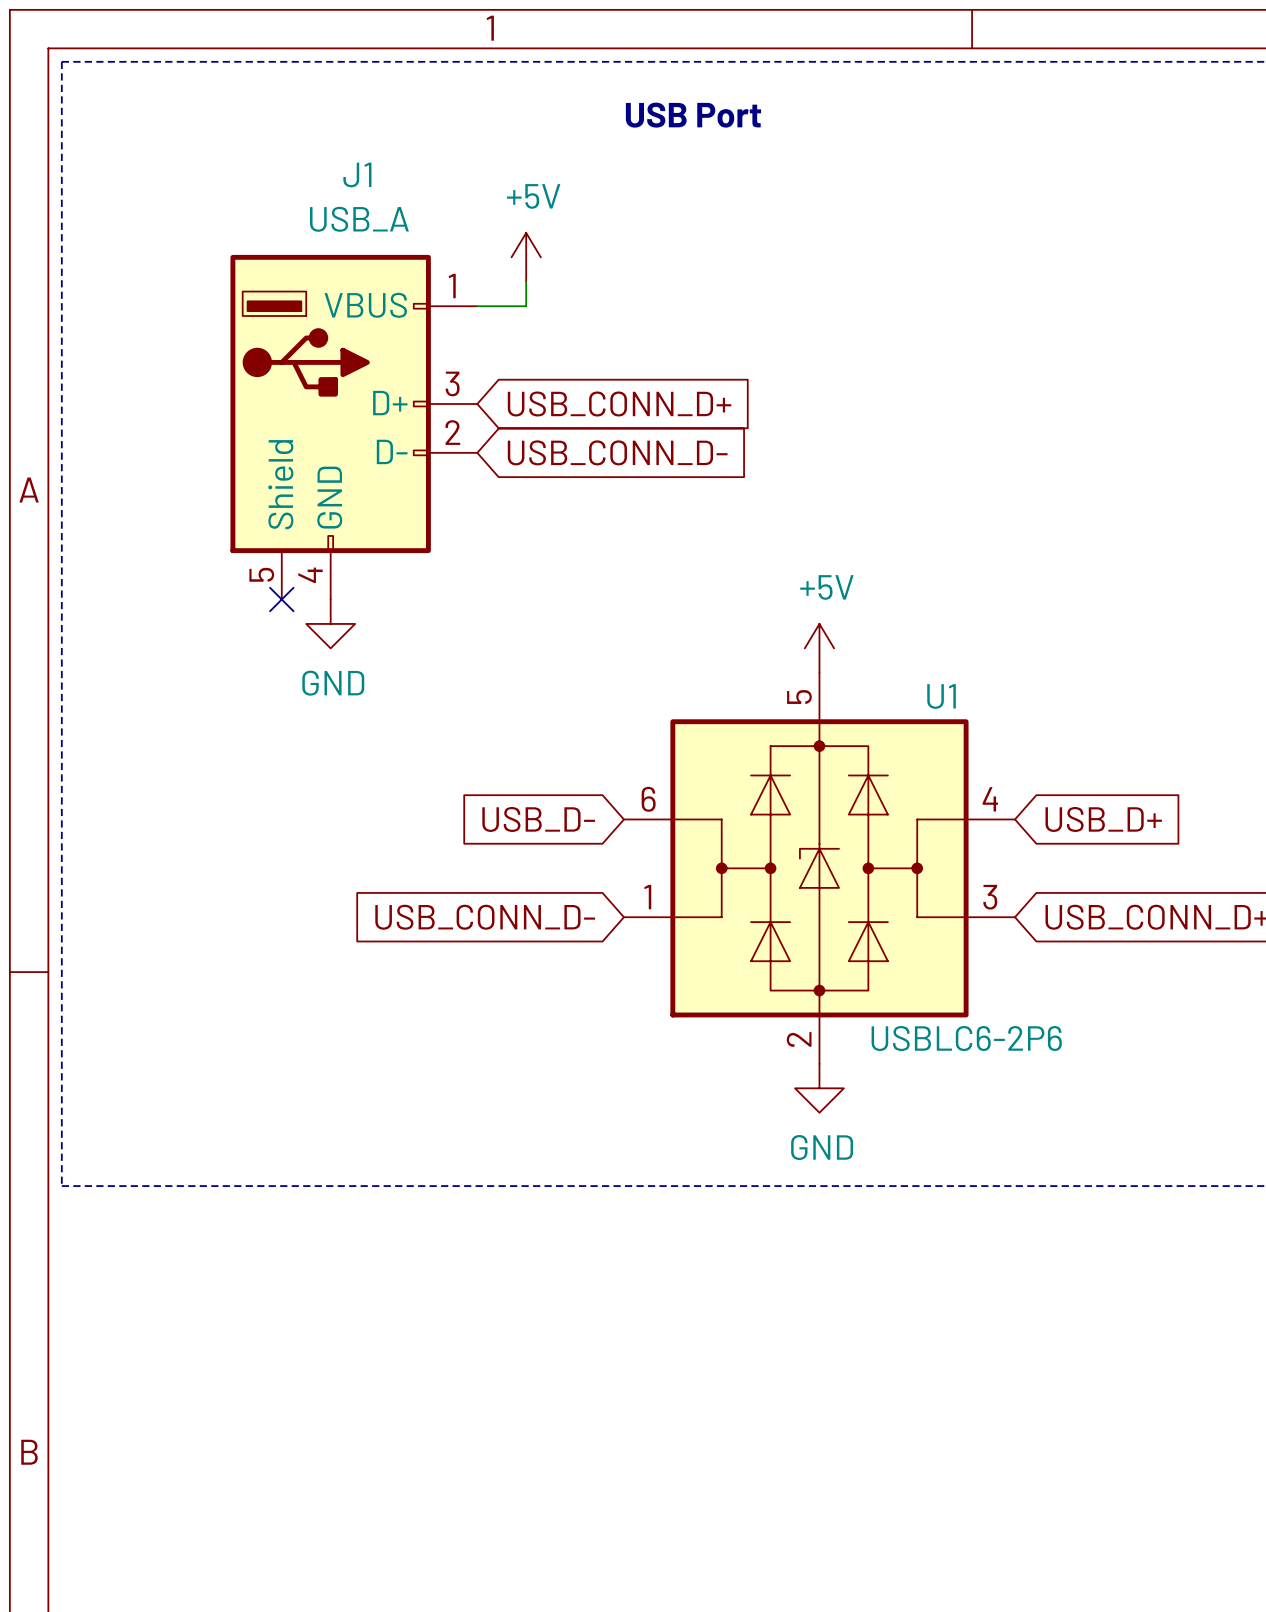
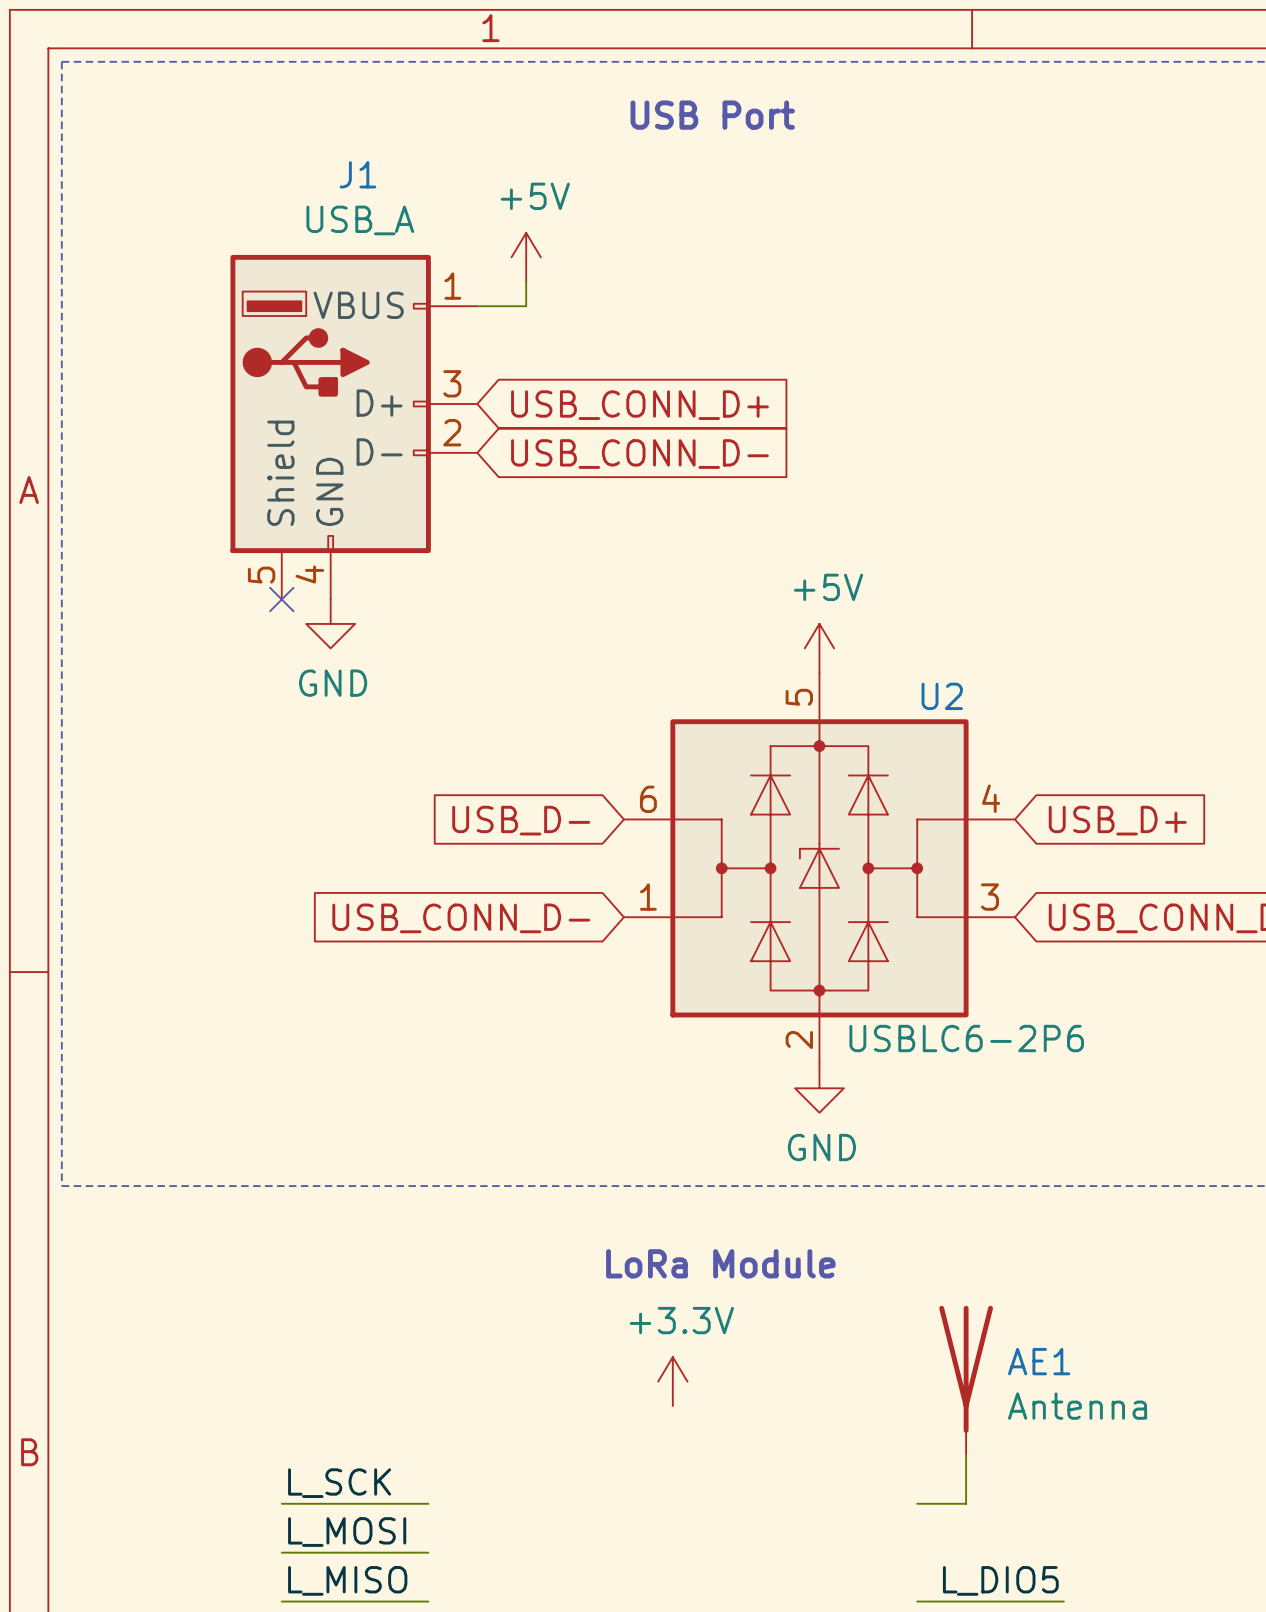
U1 name: U1 (941, 696) -> U2 (942, 696)
text: none -> LoRa Module (720, 1263)
AE1: none -> Antenna (966, 1380)
power symbol: none -> +3.3V (672, 1381)
wire: none -> (966, 1454) (966, 1503) (917, 1503)
label: none -> L_SCK (339, 1483)
wire: none -> (281, 1503) (428, 1503)
label: none -> L_MOSI (347, 1532)
wire: none -> (281, 1552) (428, 1552)
label: none -> L_MISO (347, 1580)
label: none -> L_DIO5 (1000, 1580)
wire: none -> (281, 1601) (428, 1601)
wire: none -> (917, 1601) (1063, 1601)

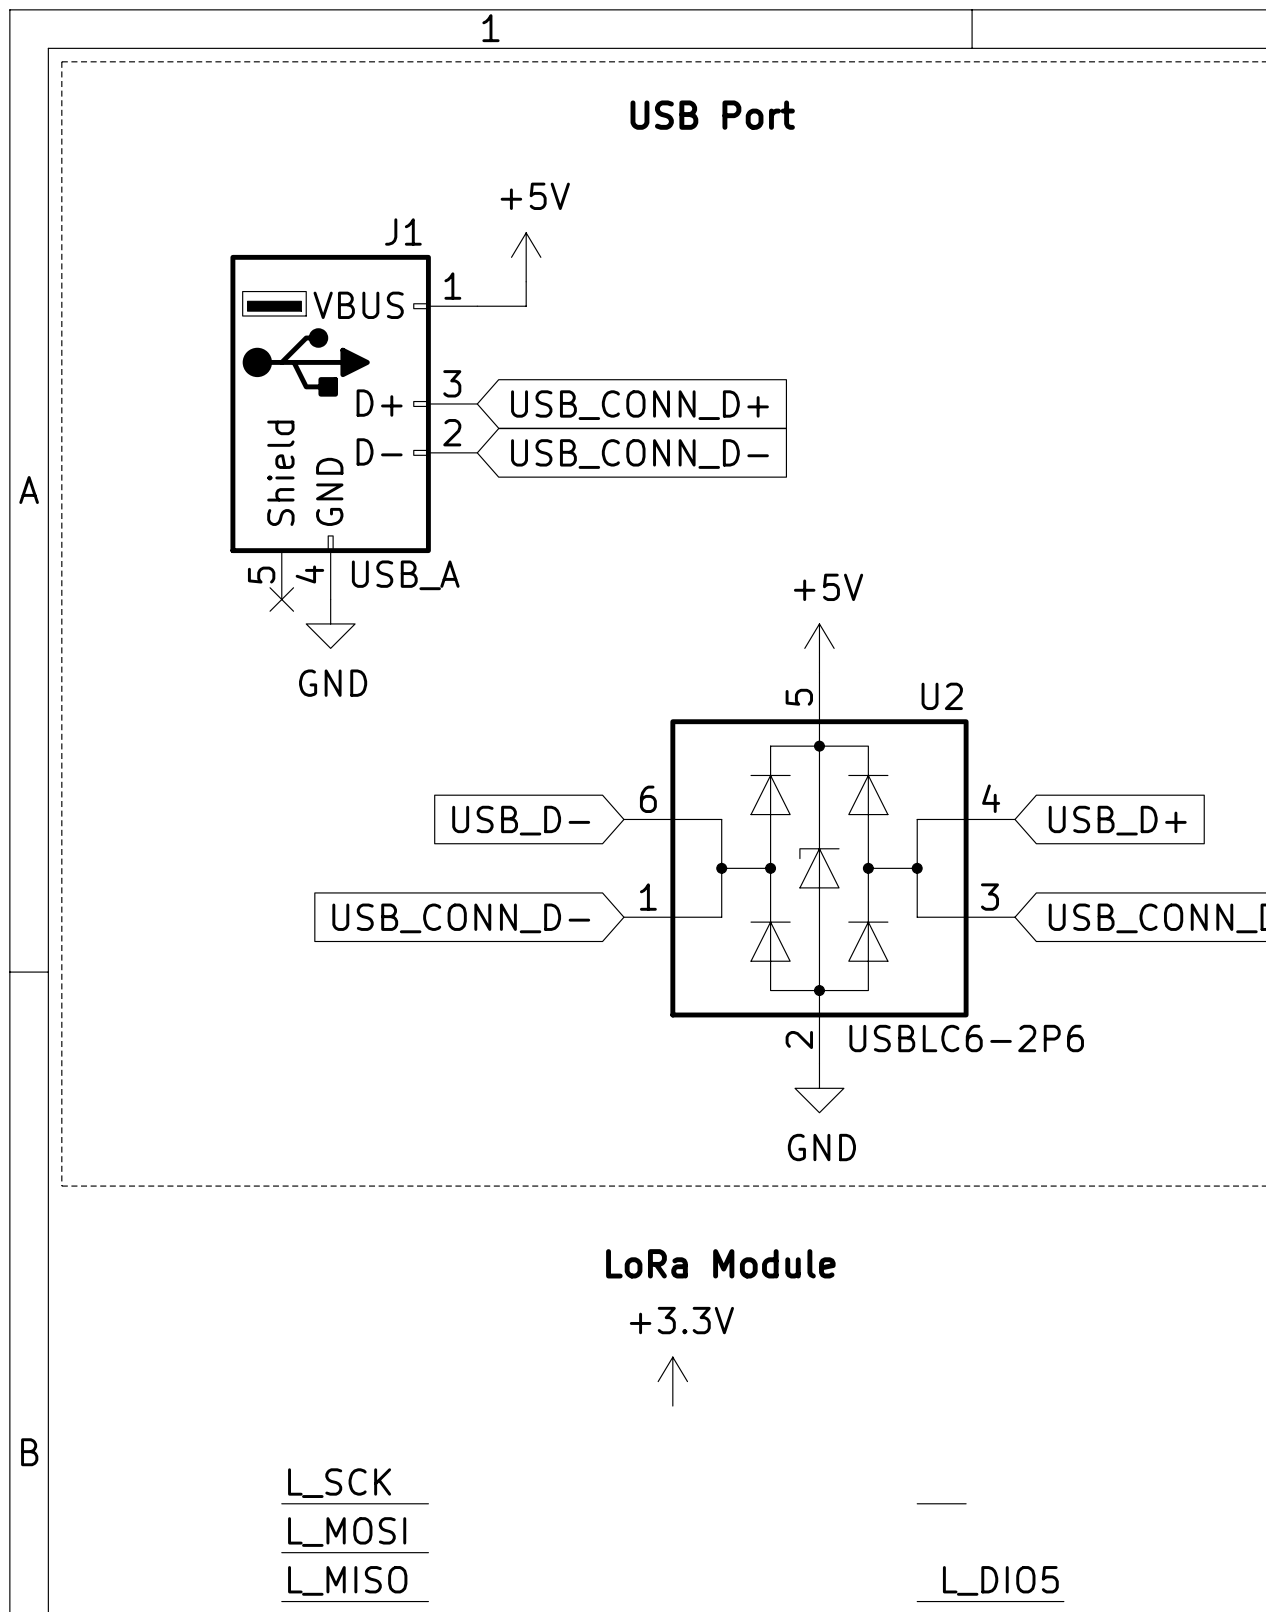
J1 name position: J1 (357, 174) -> J1 (403, 231)
J1 value position: USB_A (360, 220) -> USB_A (405, 575)
AE1: Antenna (966, 1380) -> none
wire: (966, 1454) (966, 1503) -> none

